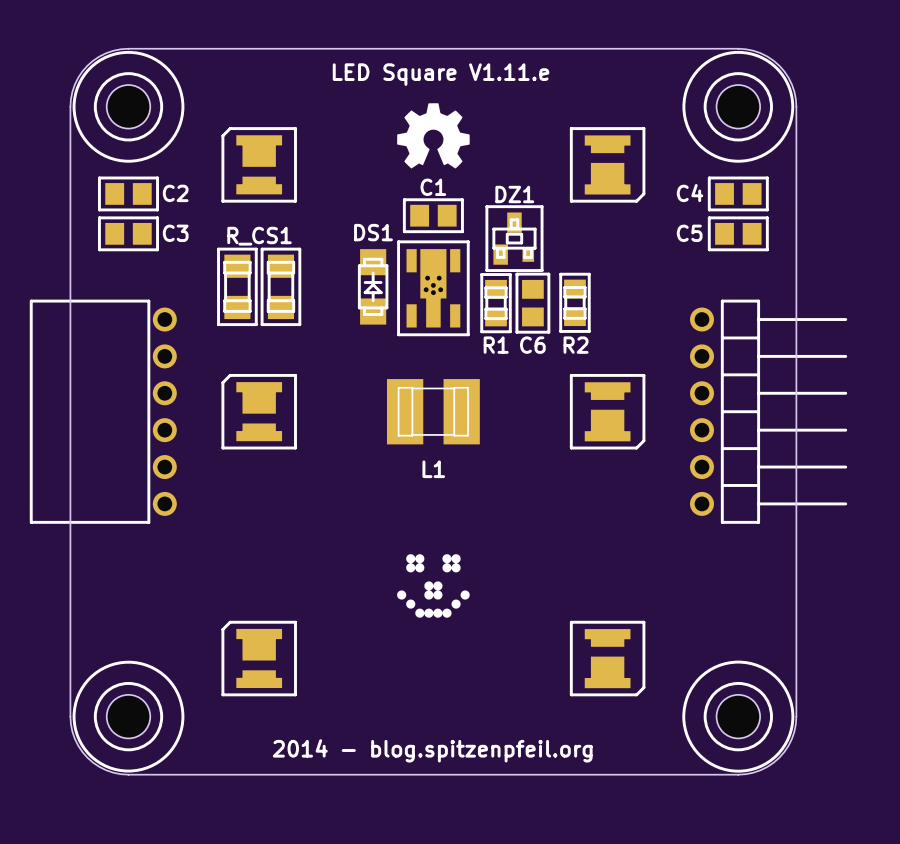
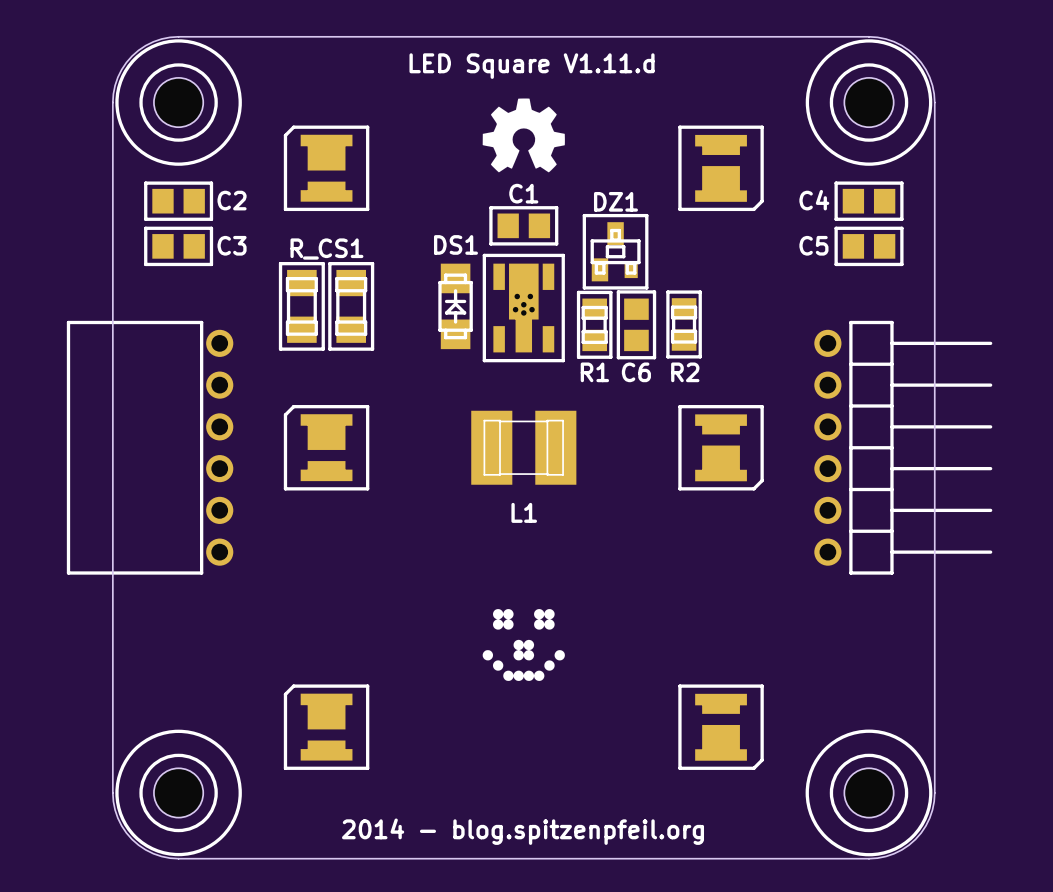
text: LED Square V1.11.e (441, 74) -> LED Square V1.11.d (532, 66)

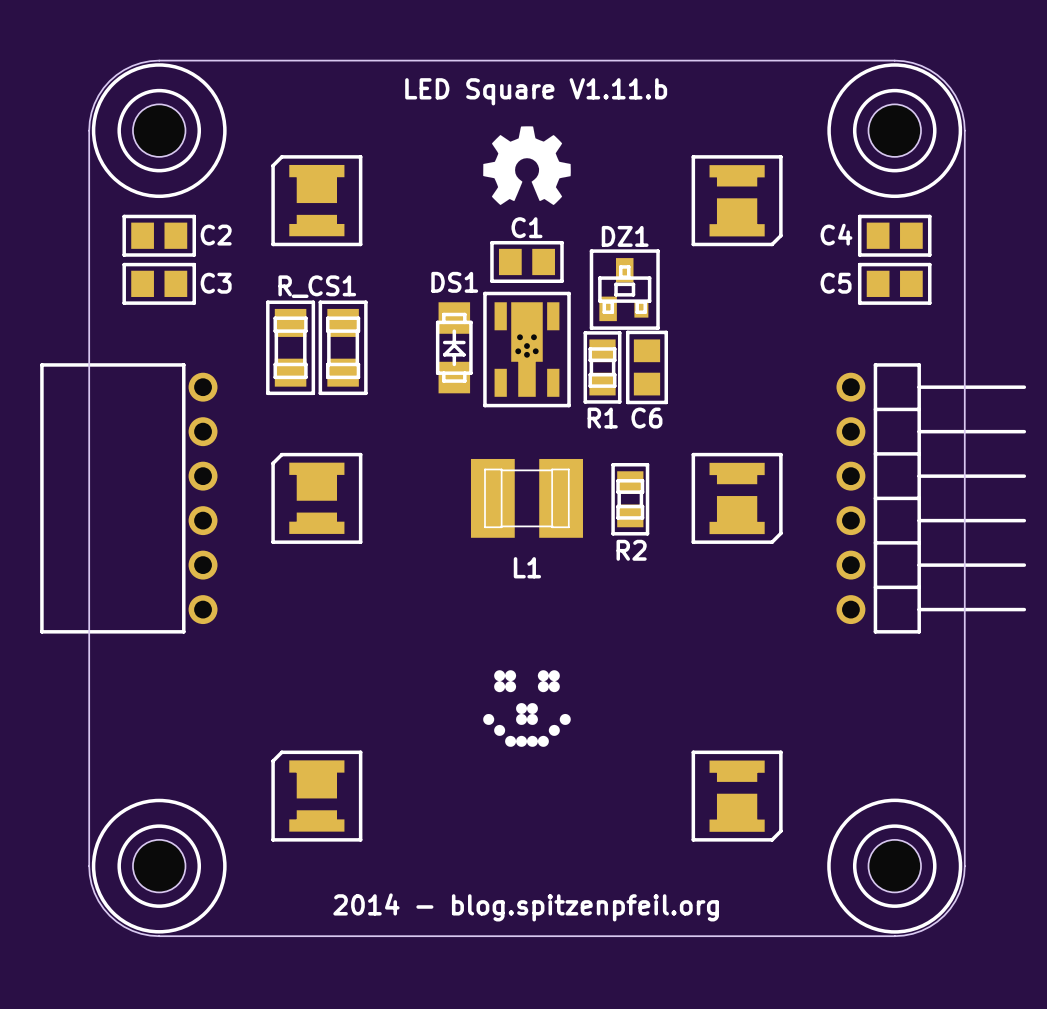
text: LED Square V1.11.d (532, 66) -> LED Square V1.11.b (536, 91)
R2 position: (684, 324) -> (630, 499)

